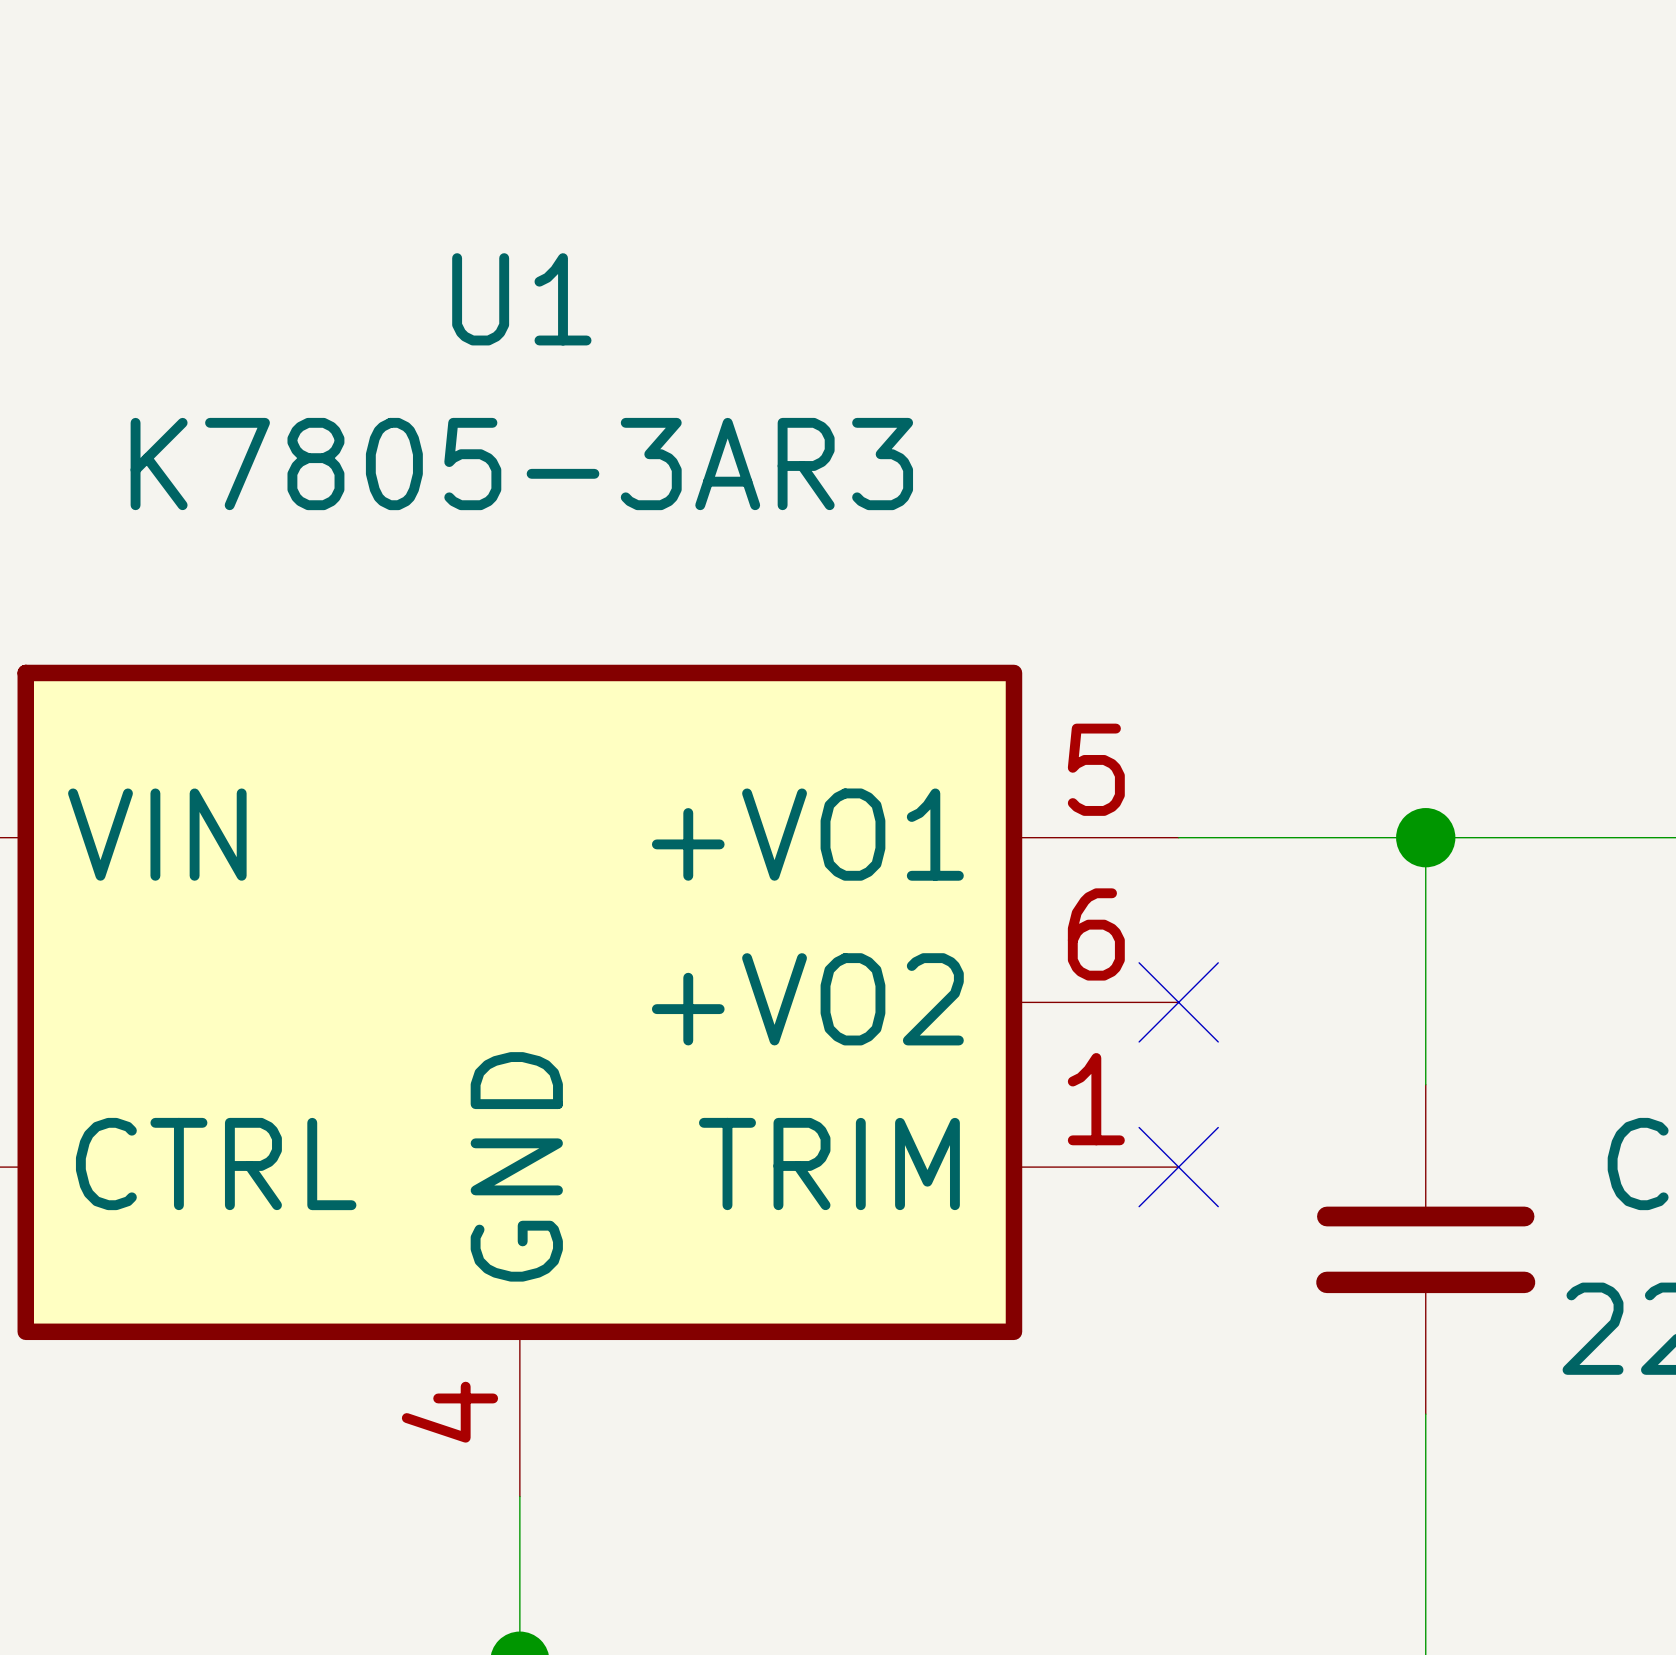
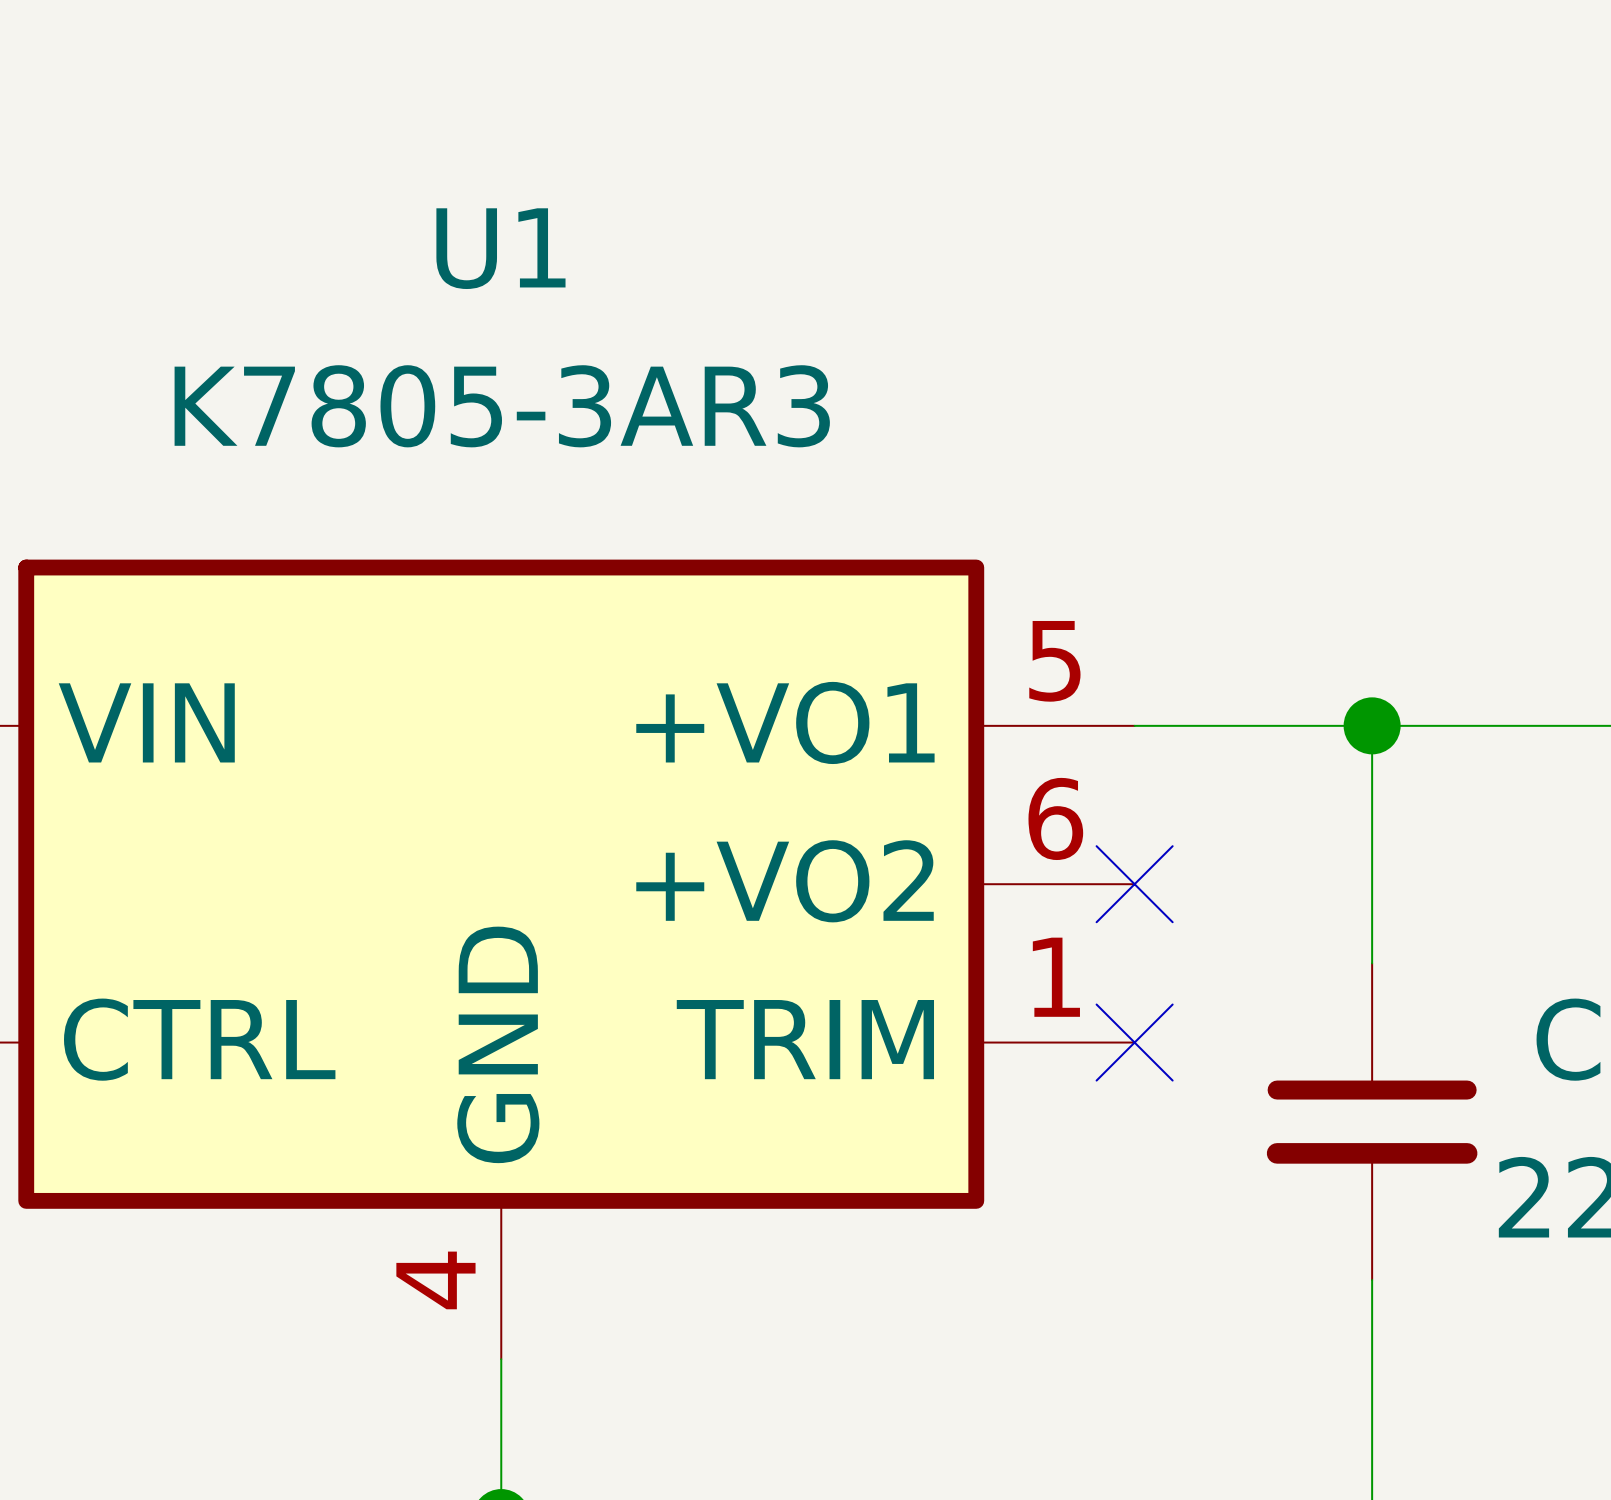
U1 name position: U1 (521, 299) -> U1 (500, 248)
U1 value position: K7805-3AR3 (521, 464) -> K7805-3AR3 (502, 406)

